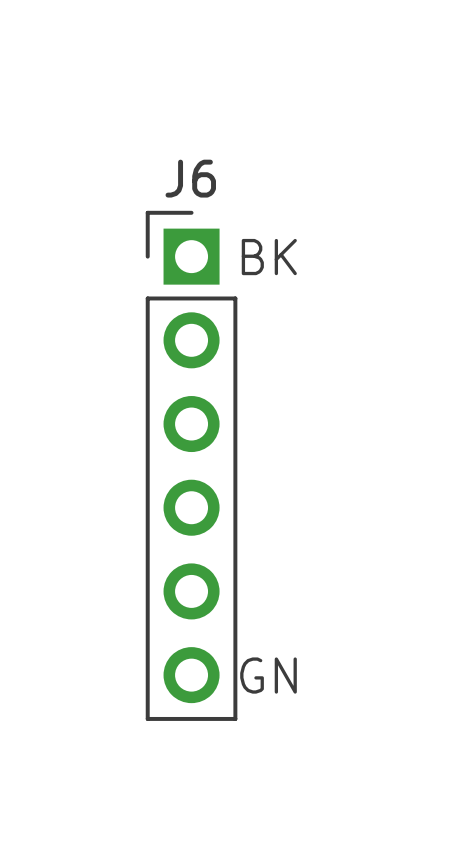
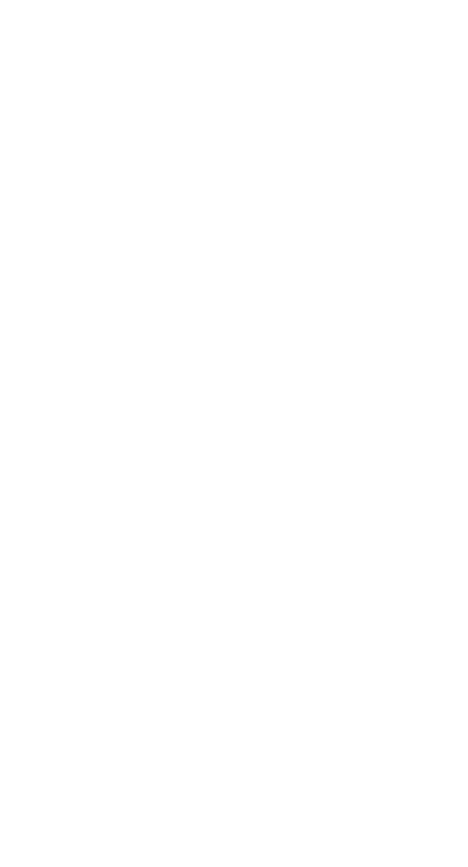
J6: (191, 465) -> none

